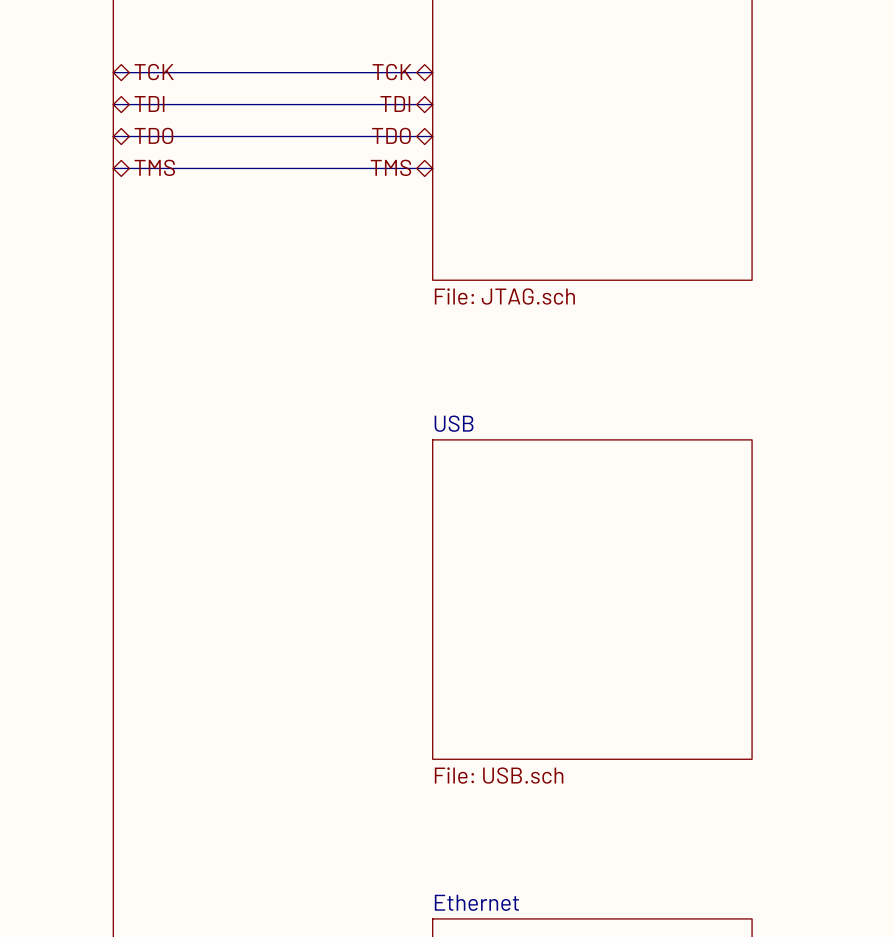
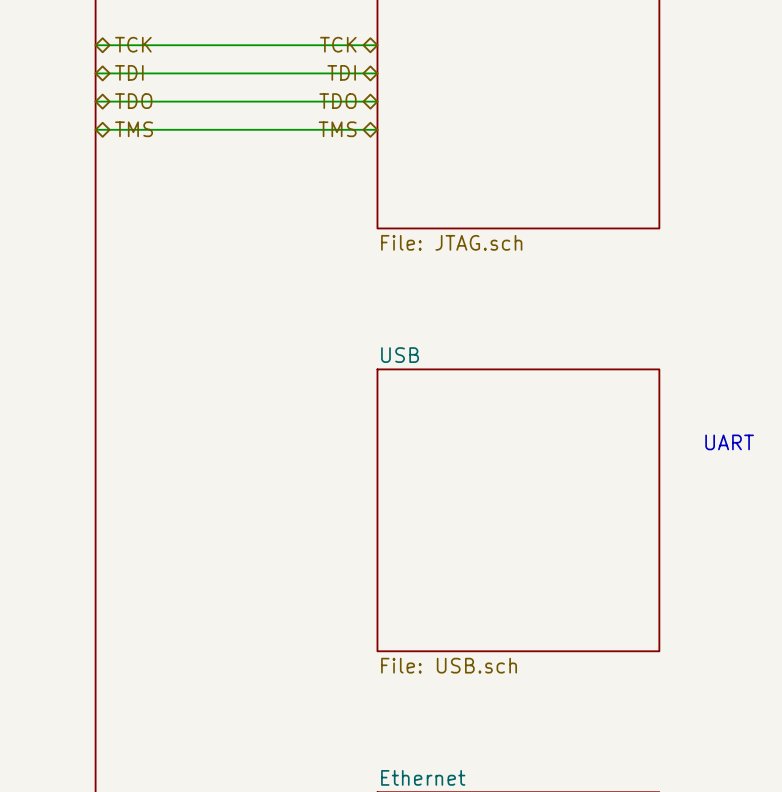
text: none -> UART (729, 442)

